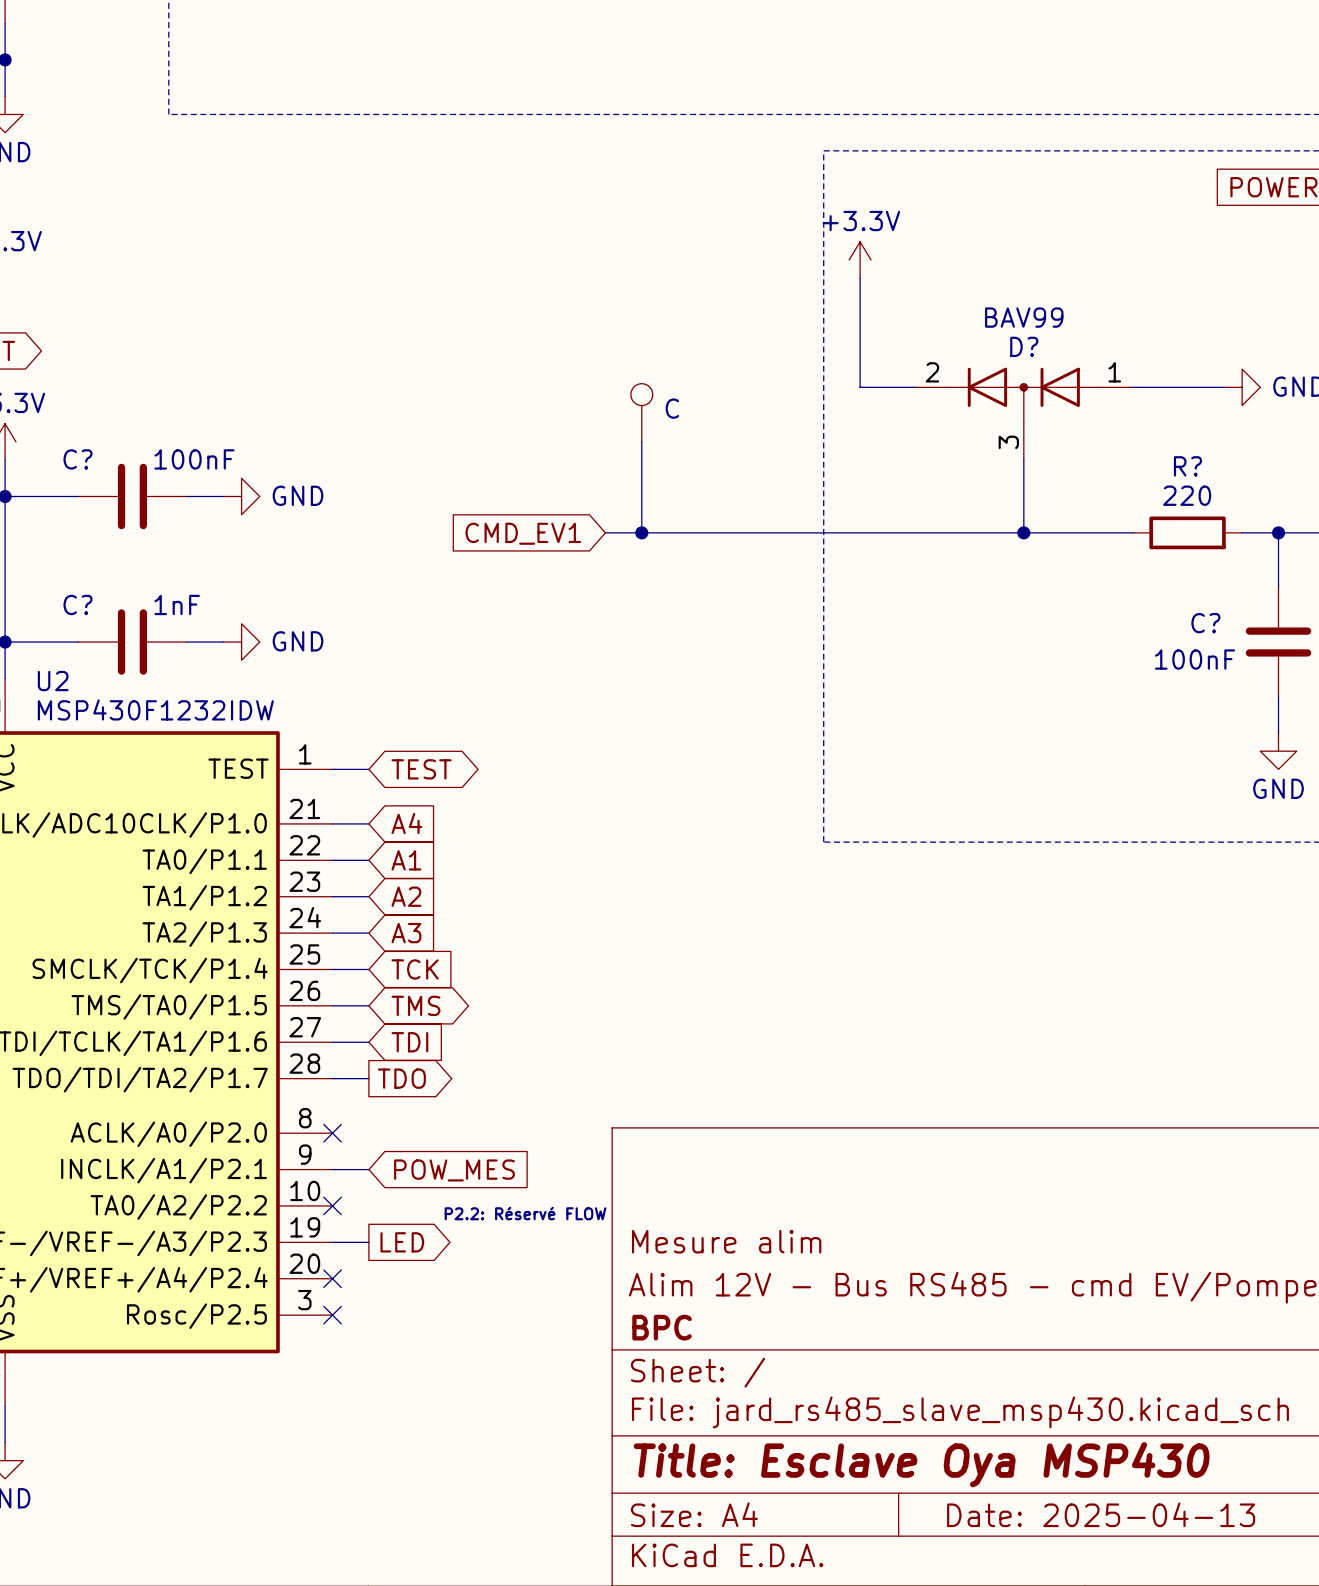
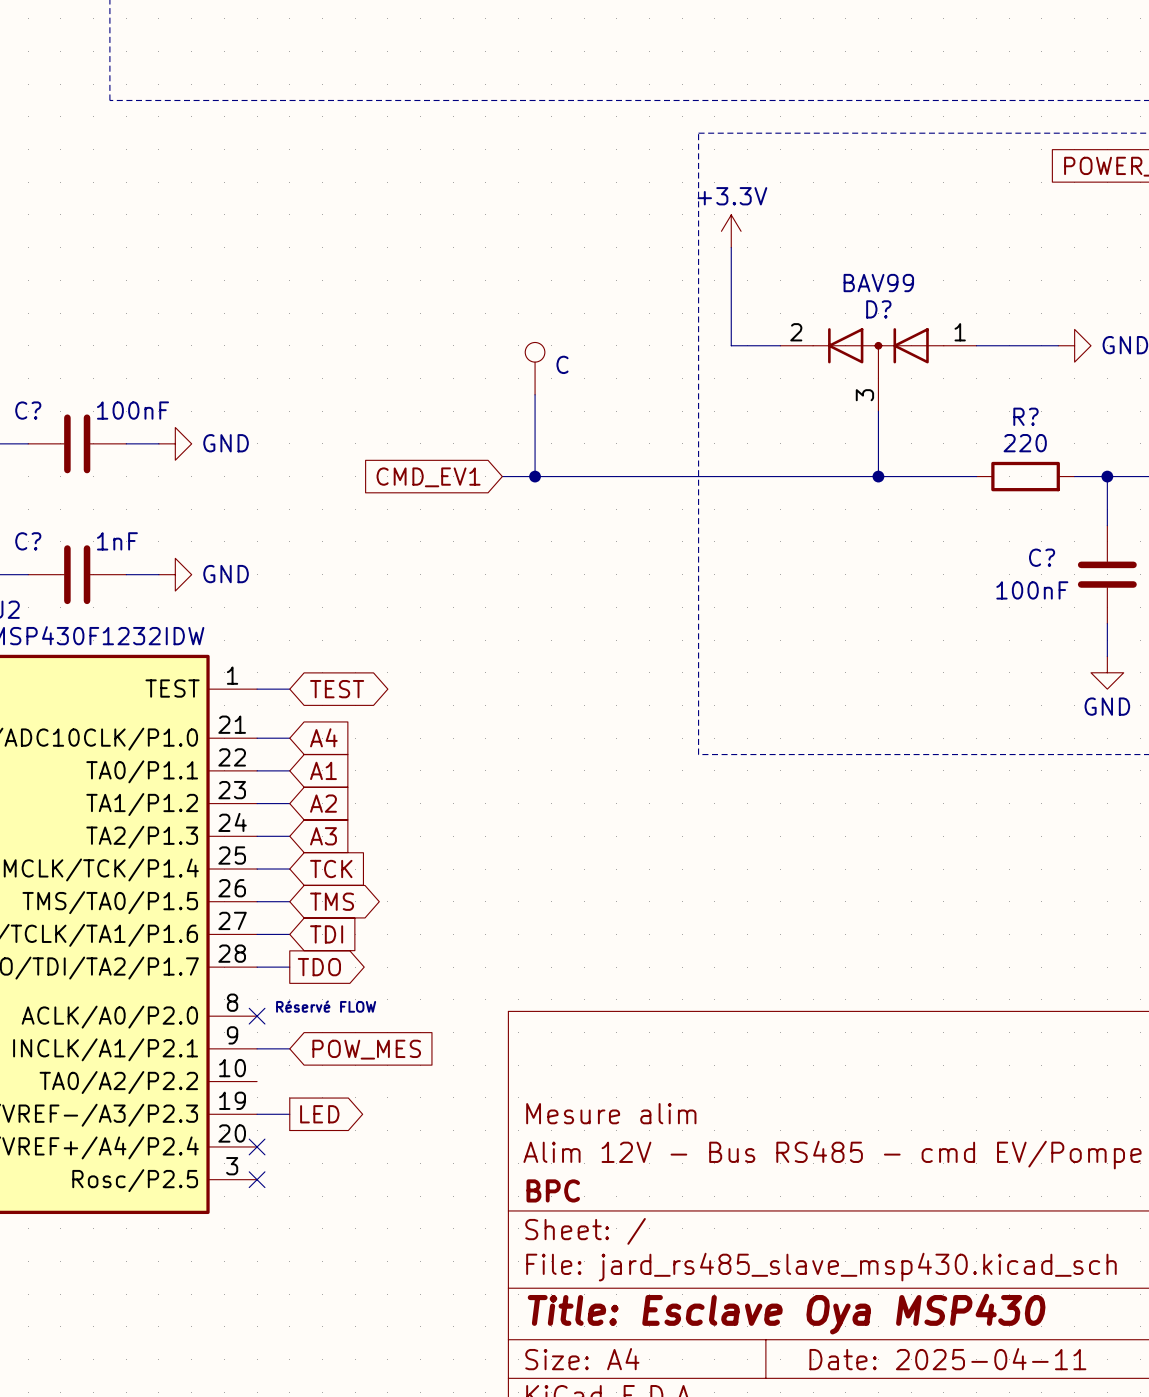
text: none -> Réservé FLOW (326, 1006)
no-connect mark: (332, 1205) -> none
text: P2.2: Réservé FLOW (525, 1213) -> none
title block: Date: 2025-04-13 (1101, 1514) -> Date: 2025-04-11 (947, 1359)

